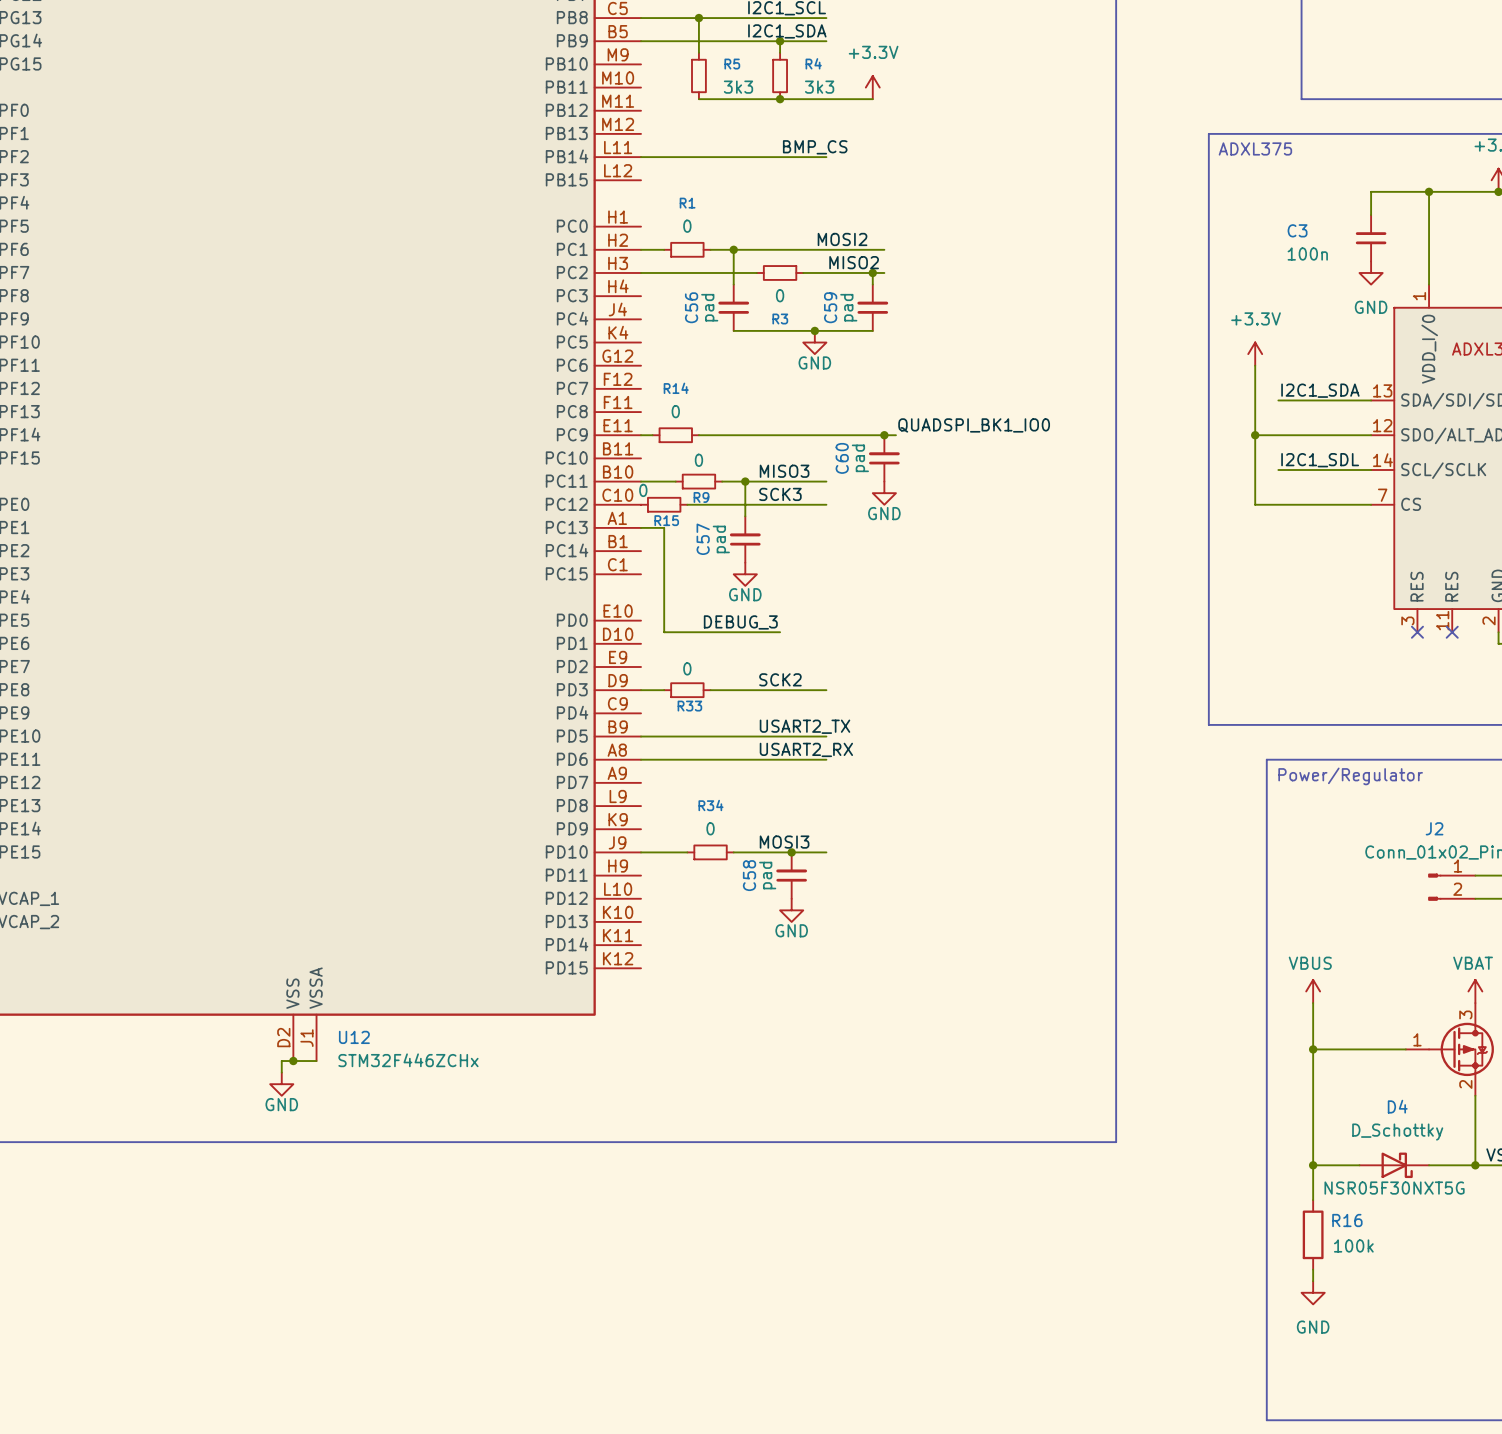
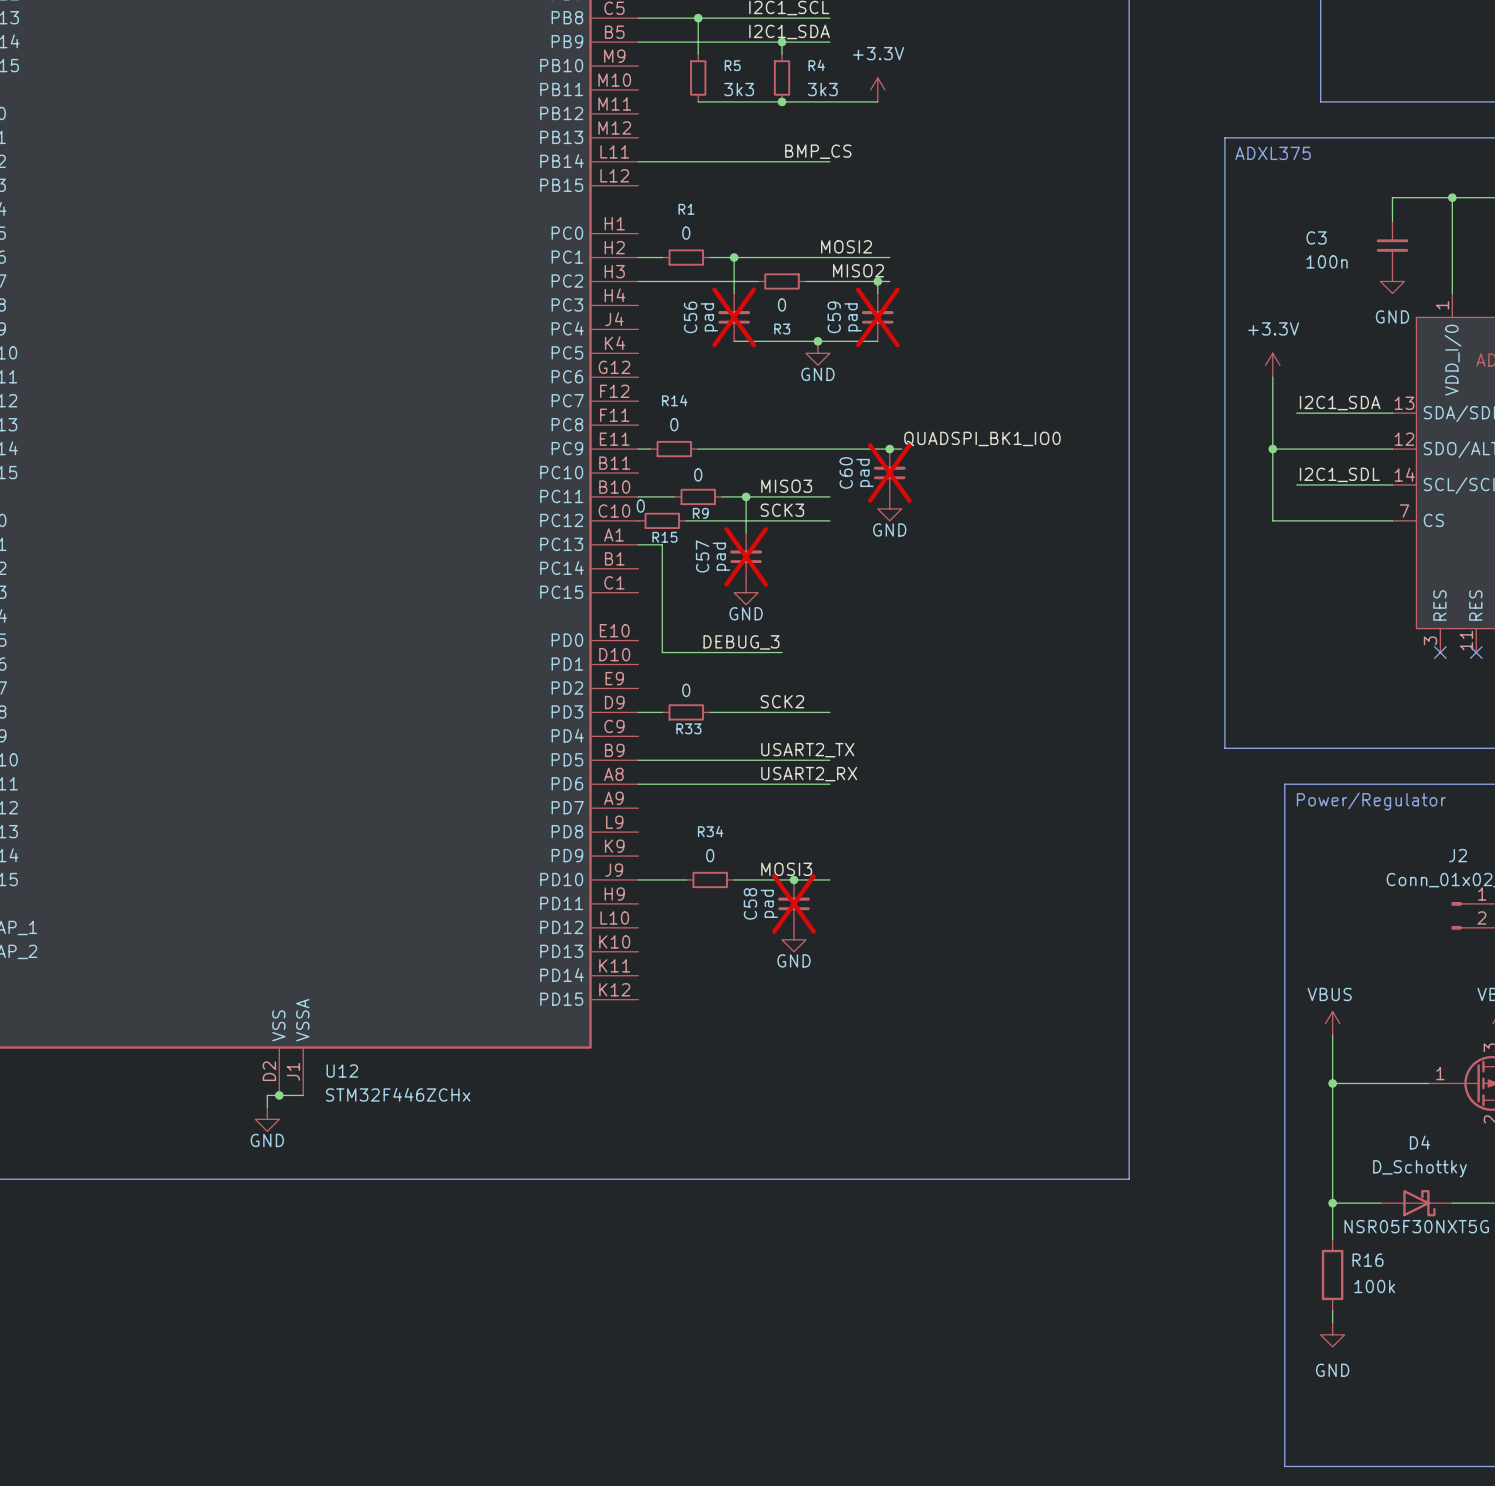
C56 do-not-place cross: none -> (734, 317)
C59 do-not-place cross: none -> (877, 317)
C60 do-not-place cross: none -> (889, 473)
C57 do-not-place cross: none -> (746, 556)
C58 do-not-place cross: none -> (793, 903)

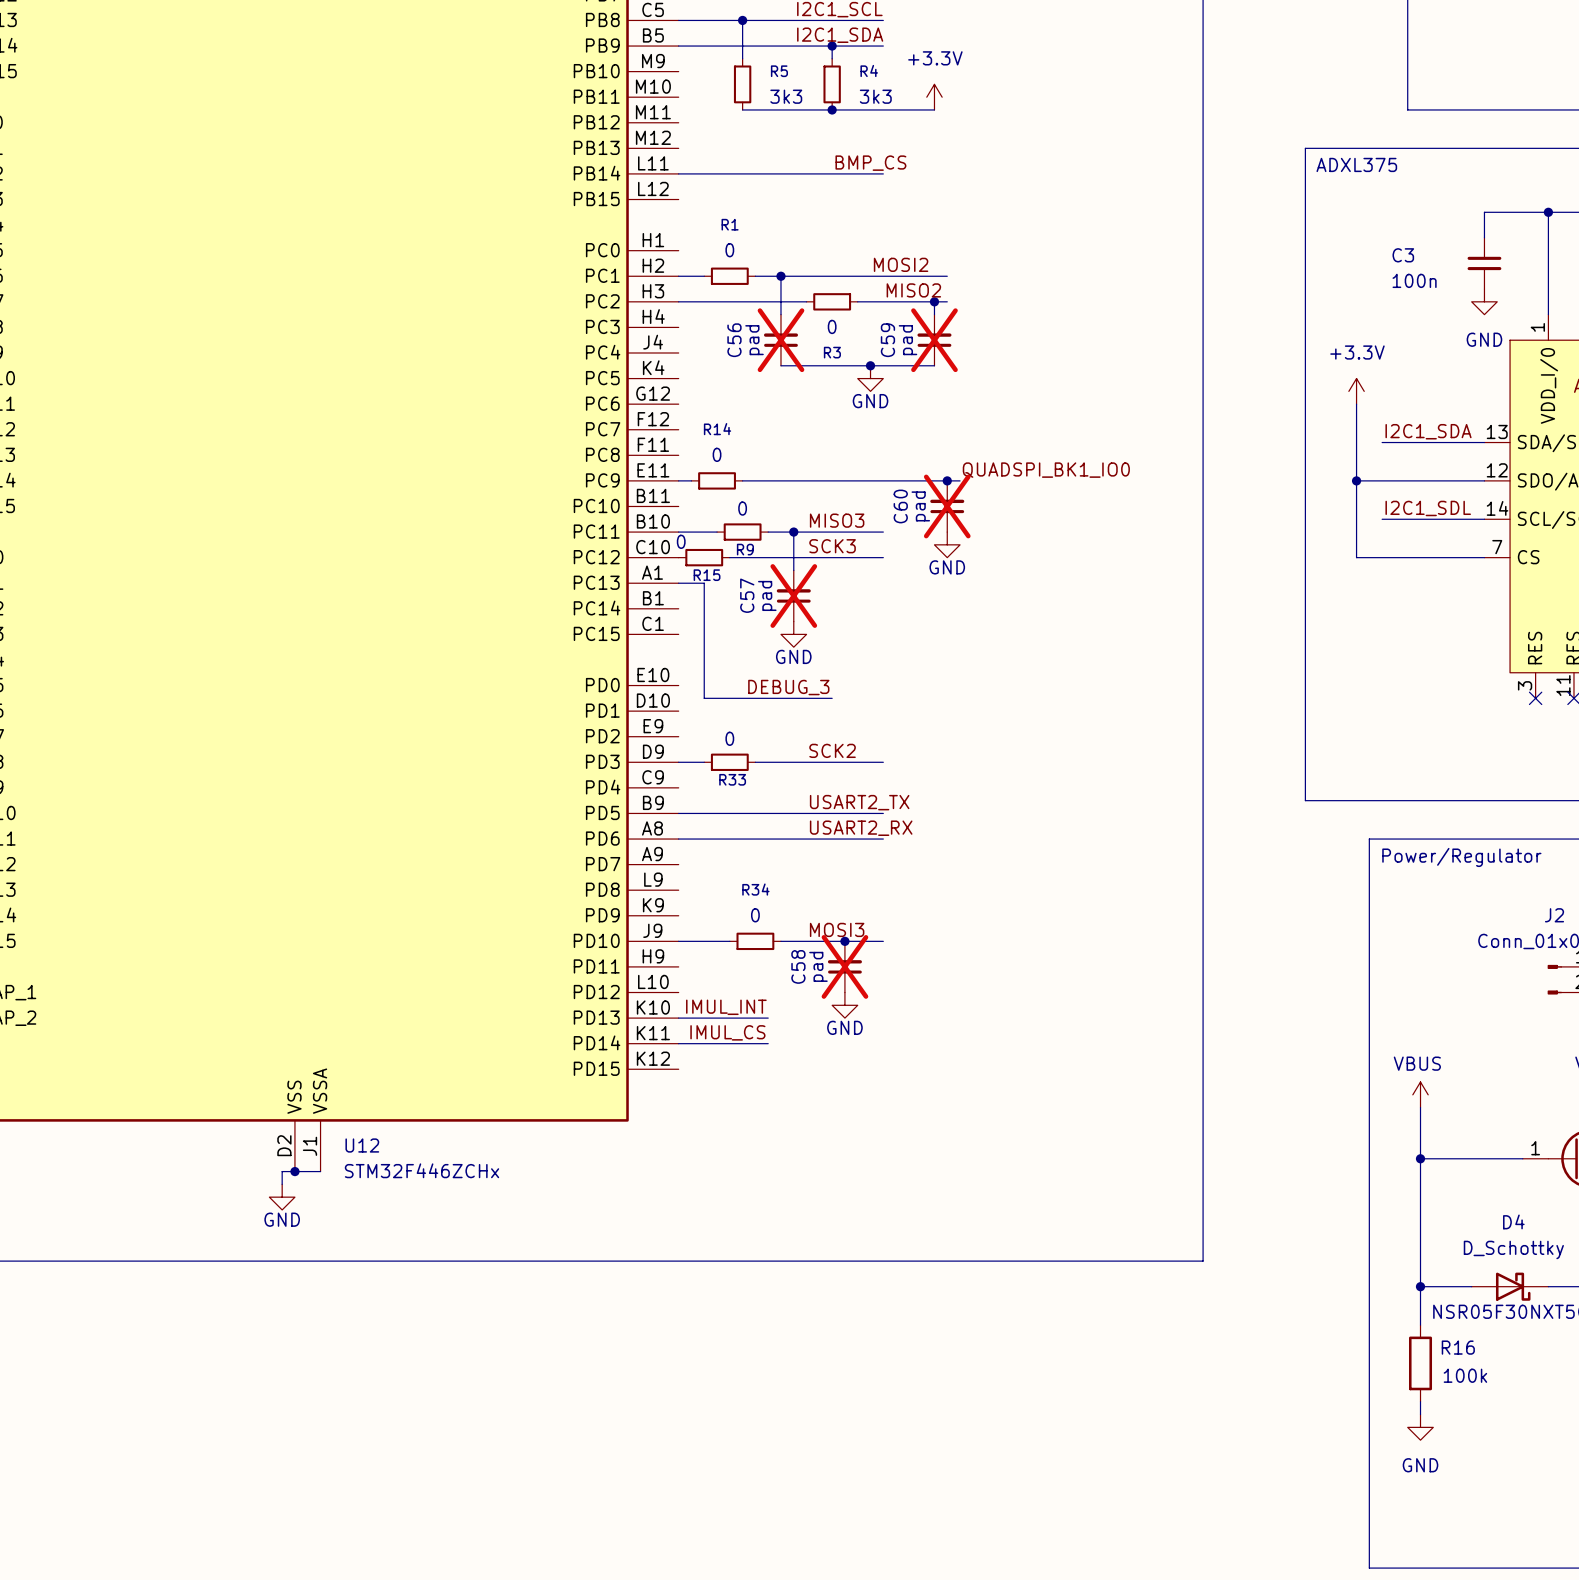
label: none -> IMUL_INT (726, 1007)
wire: none -> (678, 1018) (768, 1018)
label: none -> IMUL_CS (727, 1032)
wire: none -> (678, 1043) (768, 1043)

